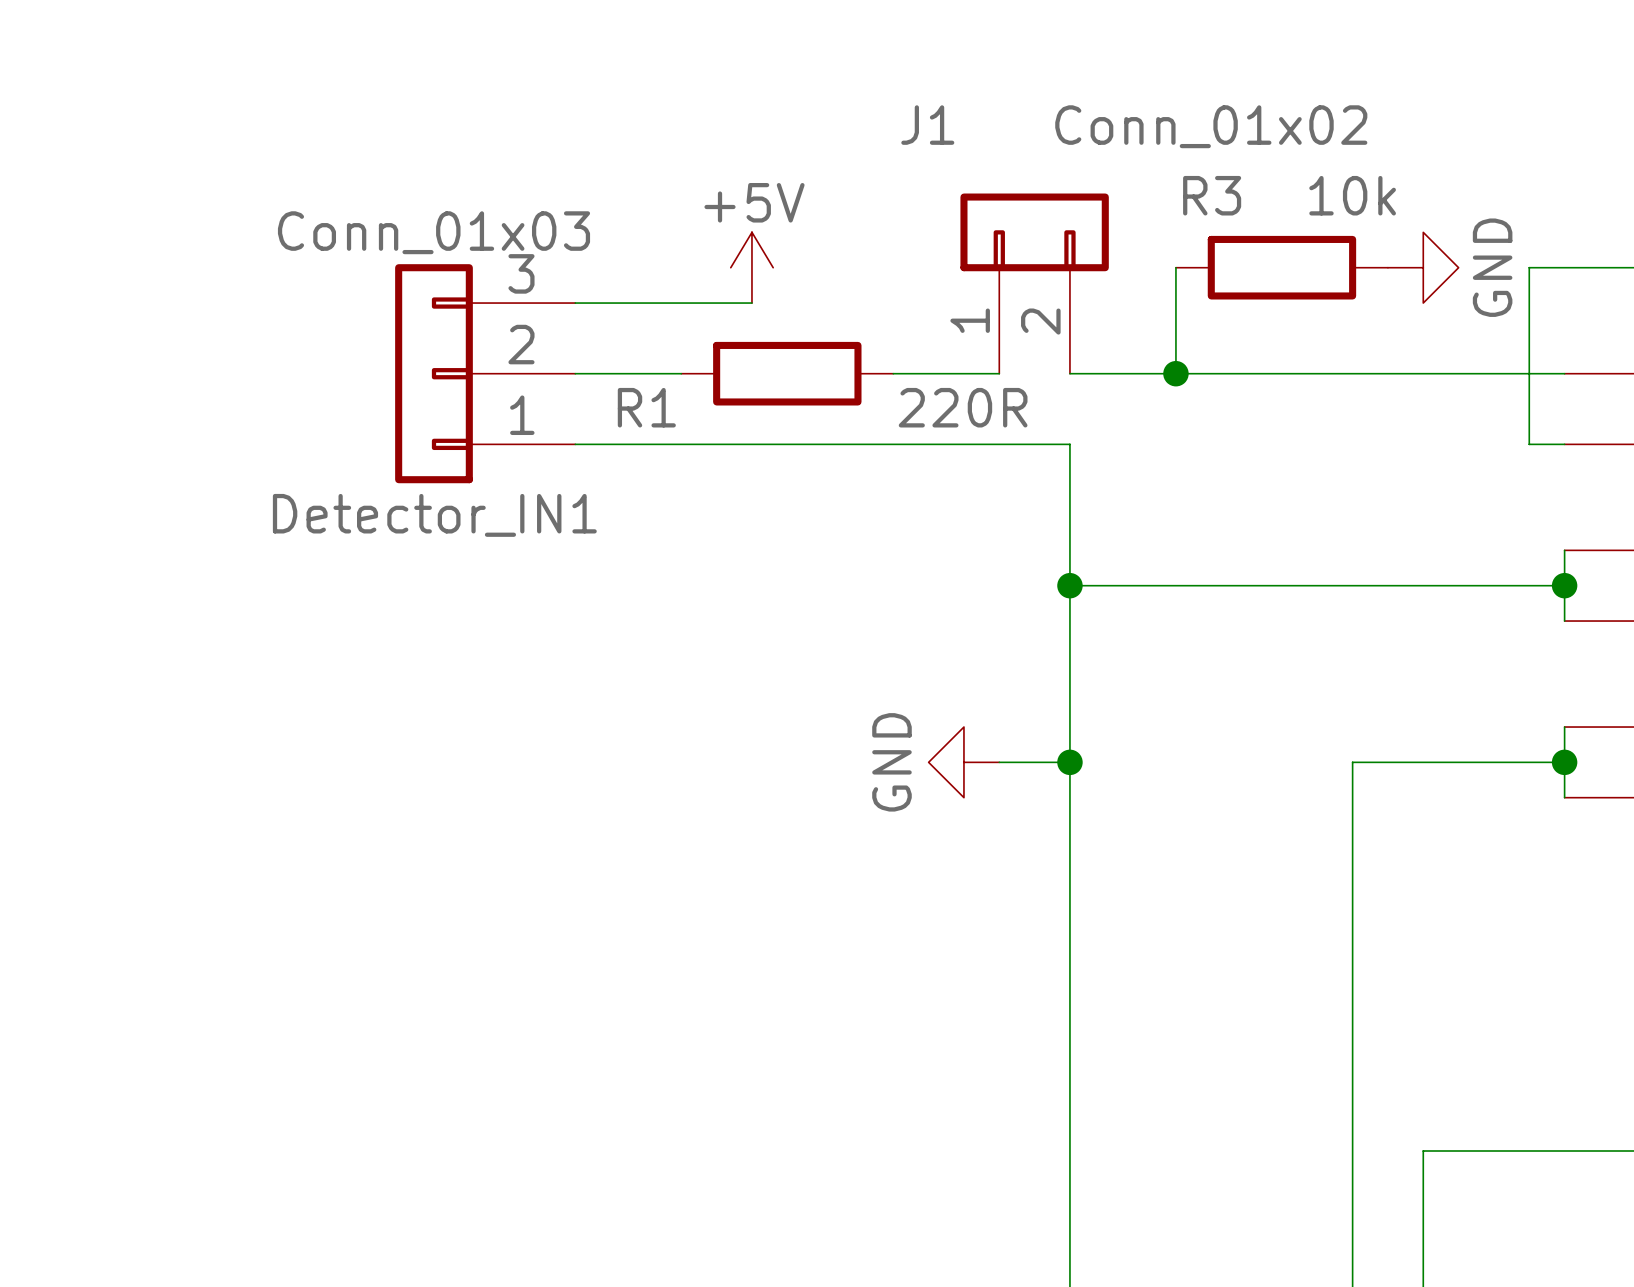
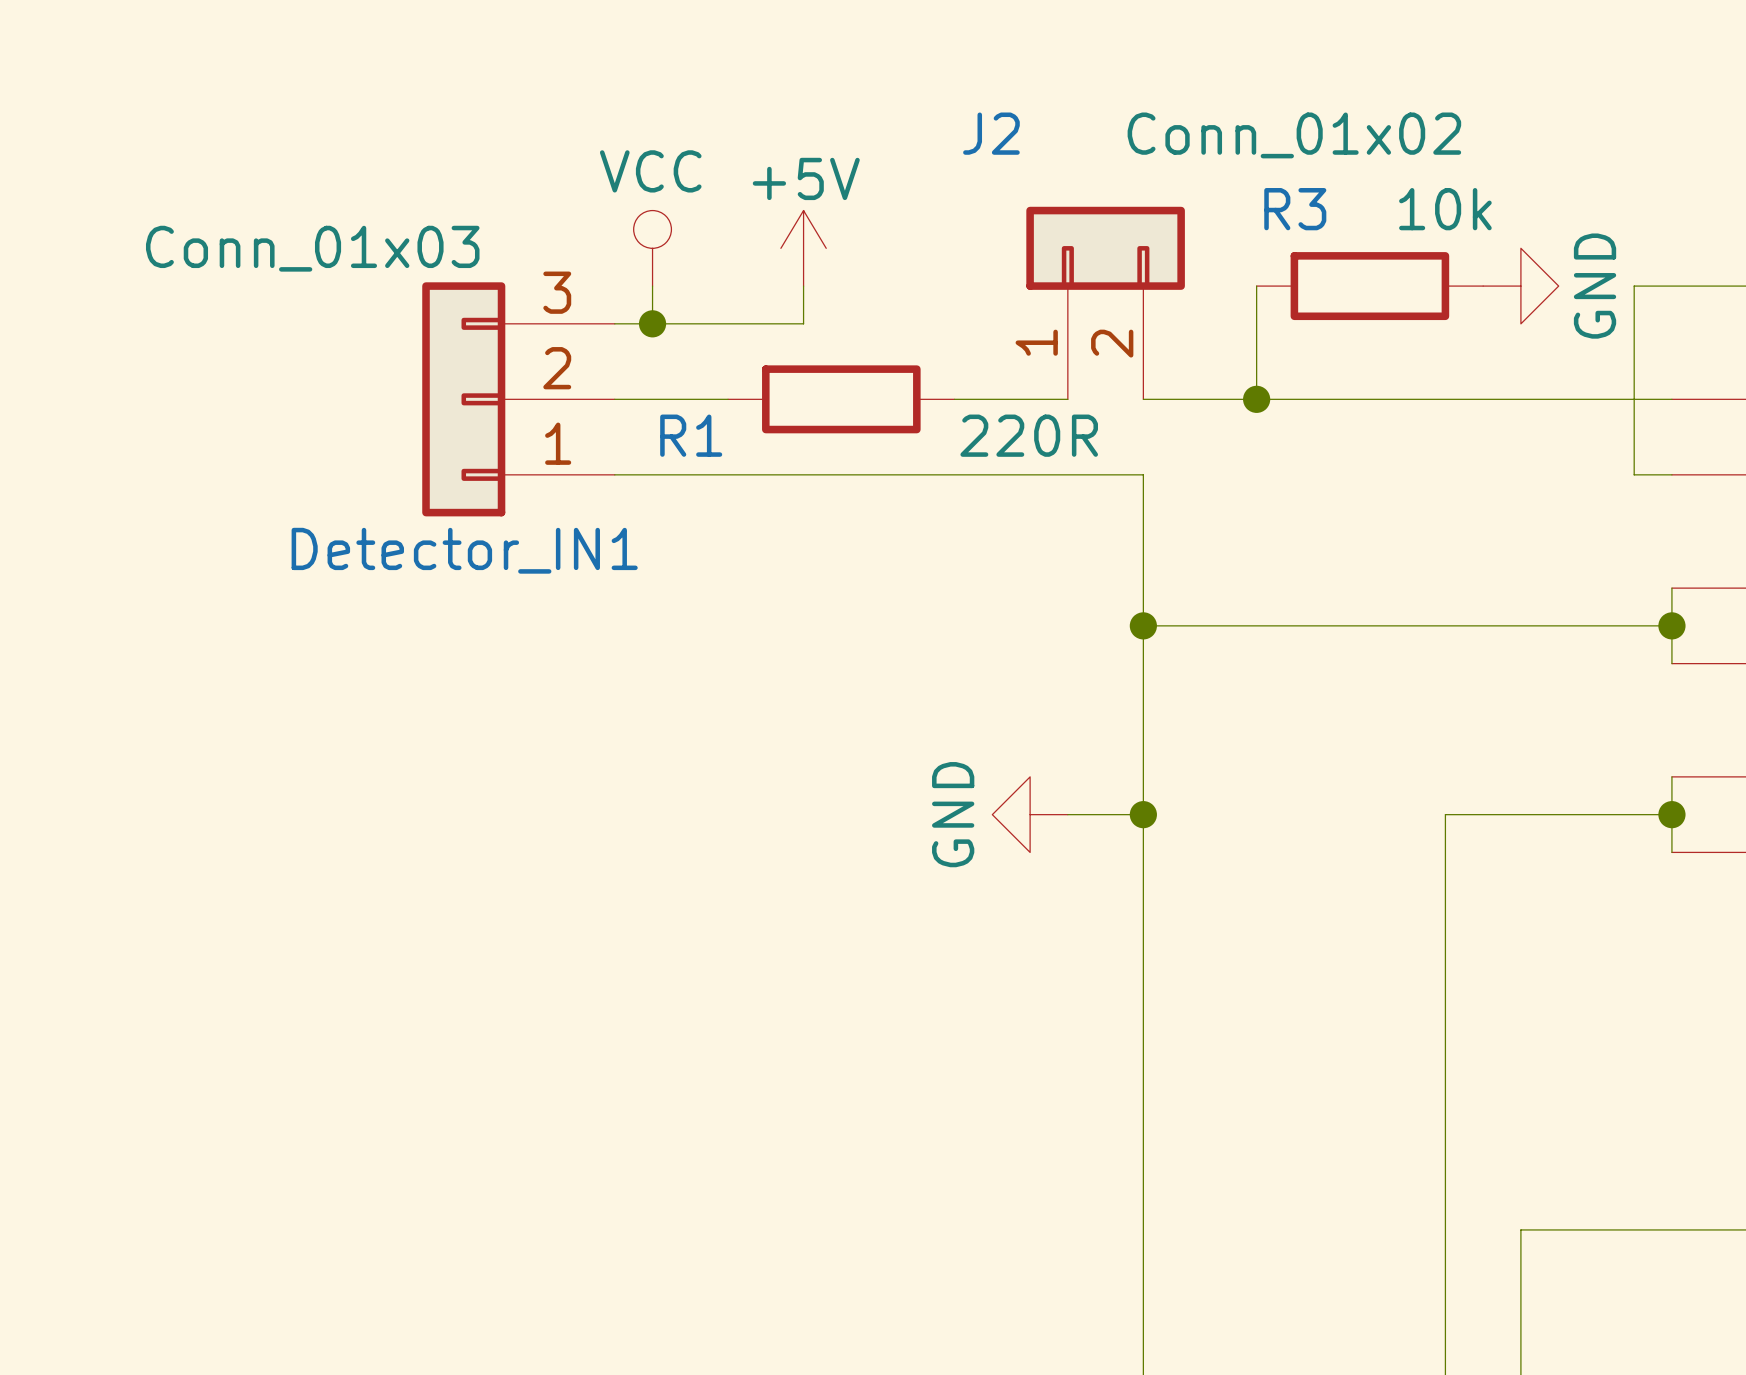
J1 name: J1 (927, 125) -> J2 (991, 133)
Detector_IN1 value position: Conn_01x03 (433, 232) -> Conn_01x03 (312, 248)
power symbol: none -> VCC (652, 248)
wire: none -> (652, 286) (652, 323)
power symbol position: +5V (751, 267) -> +5V (803, 248)
junction: none -> (652, 323)

